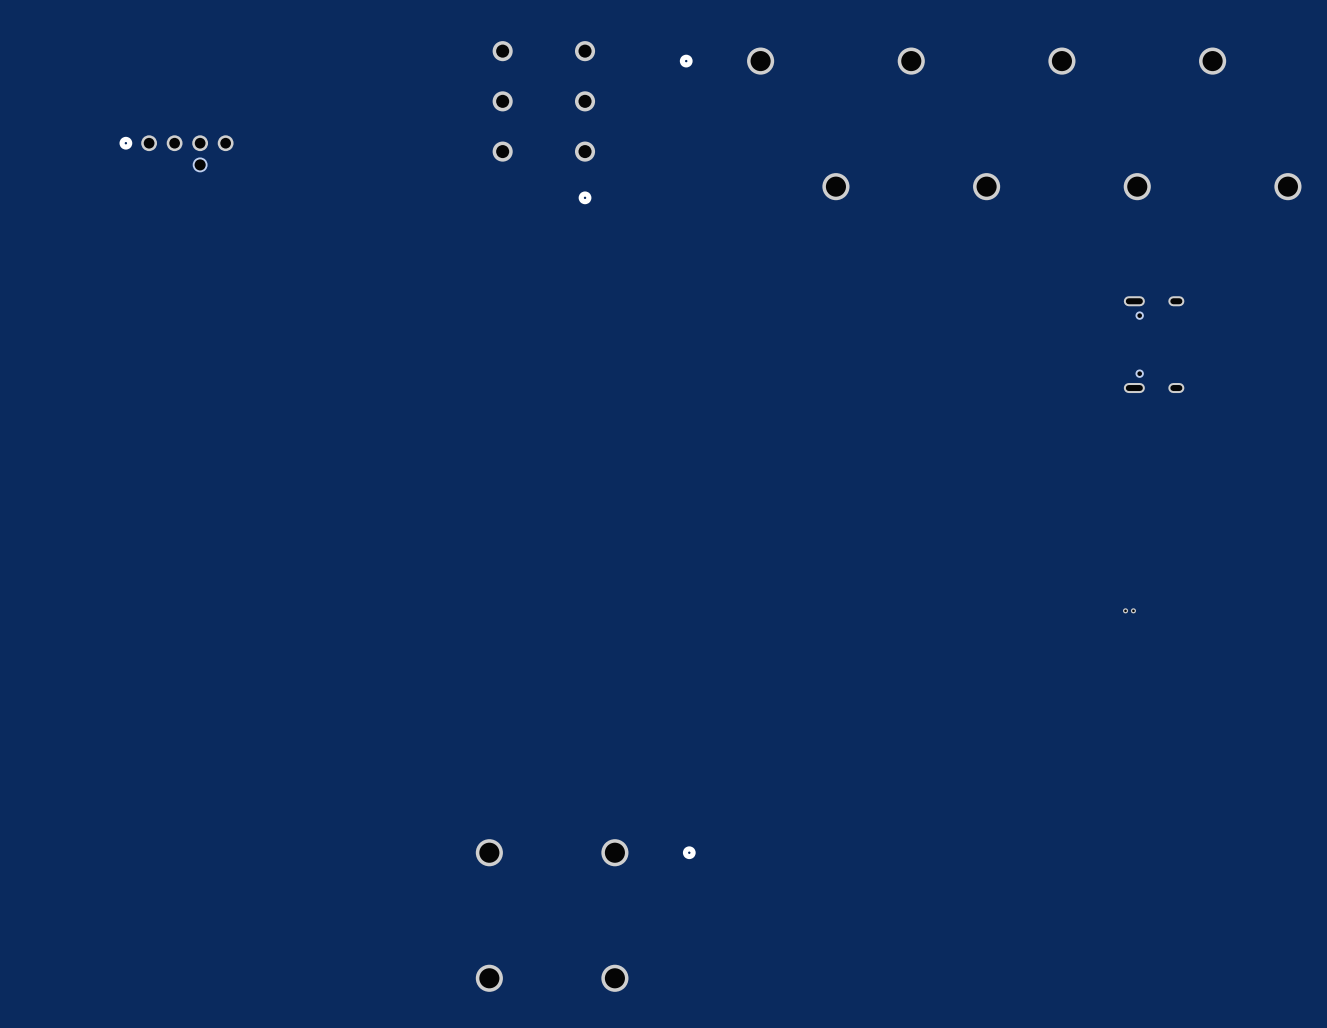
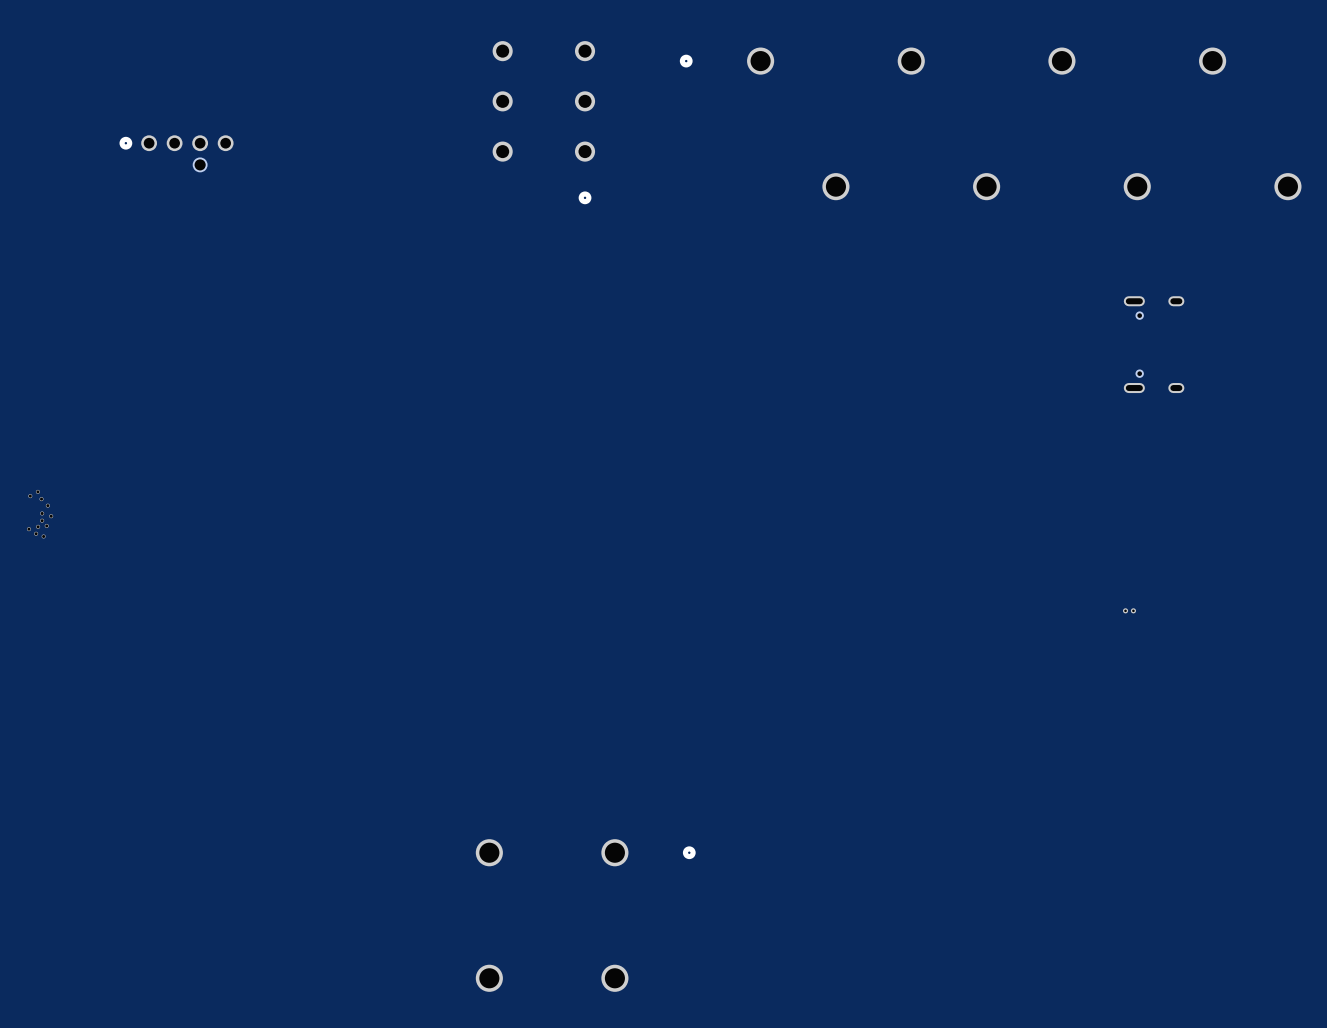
via: none -> (37, 491)
via: none -> (30, 496)
via: none -> (41, 499)
via: none -> (47, 505)
via: none -> (42, 513)
via: none -> (51, 516)
via: none -> (42, 520)
via: none -> (46, 525)
via: none -> (38, 526)
via: none -> (28, 529)
via: none -> (36, 533)
via: none -> (43, 536)

